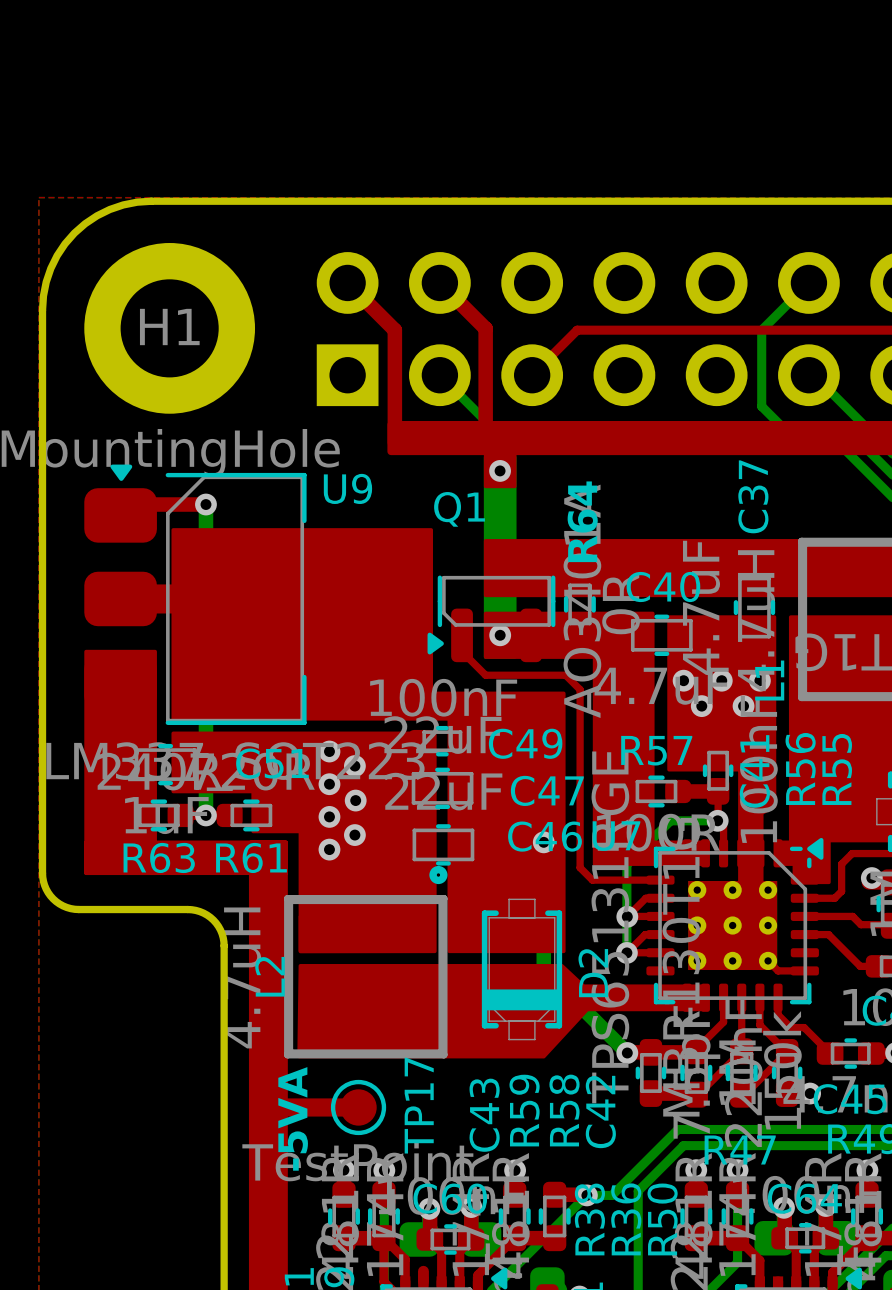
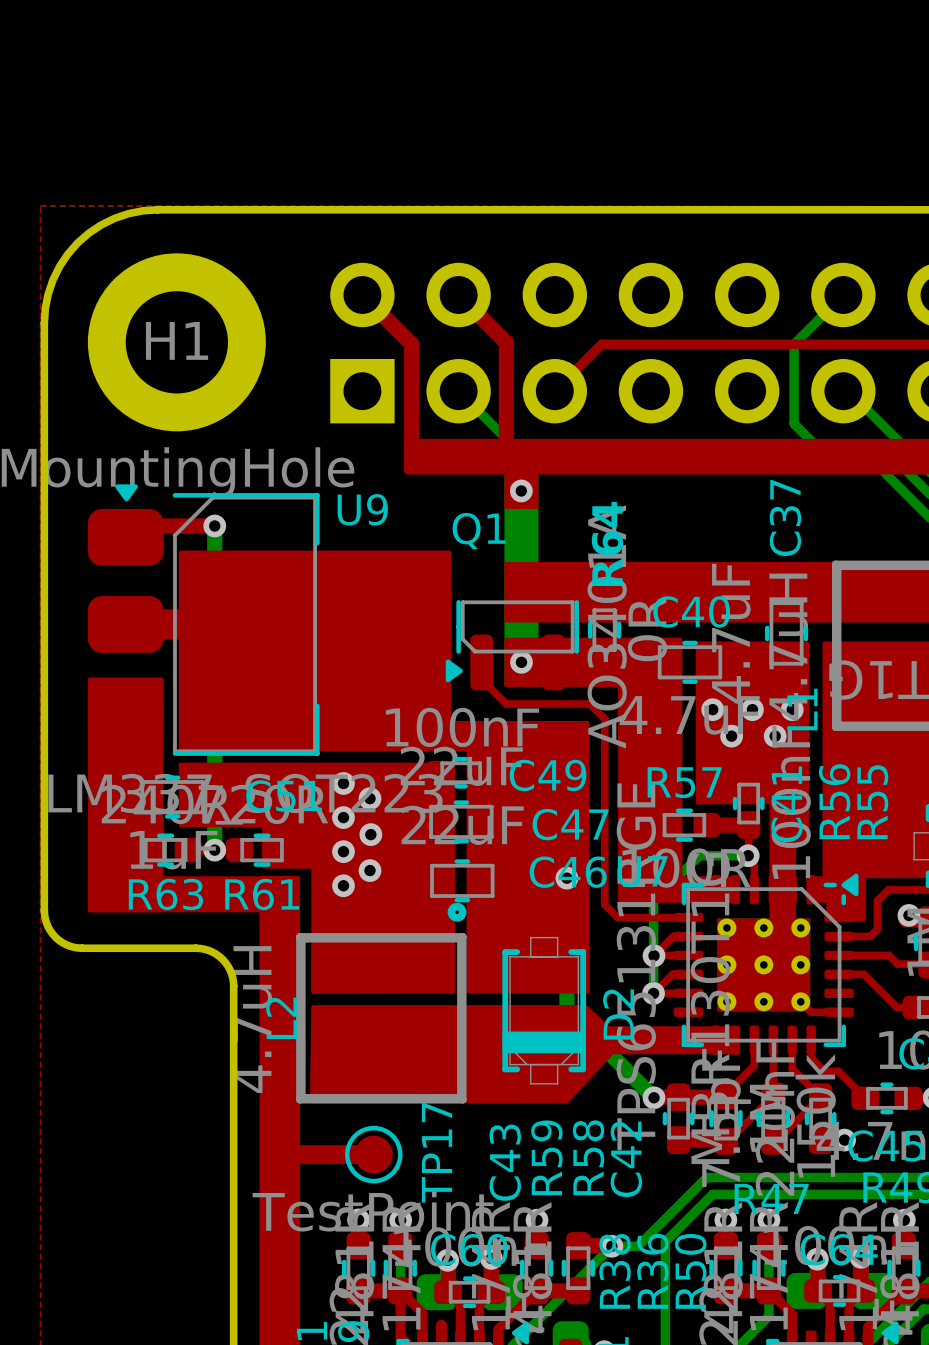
text: -5VA (293, 1118) -> none

